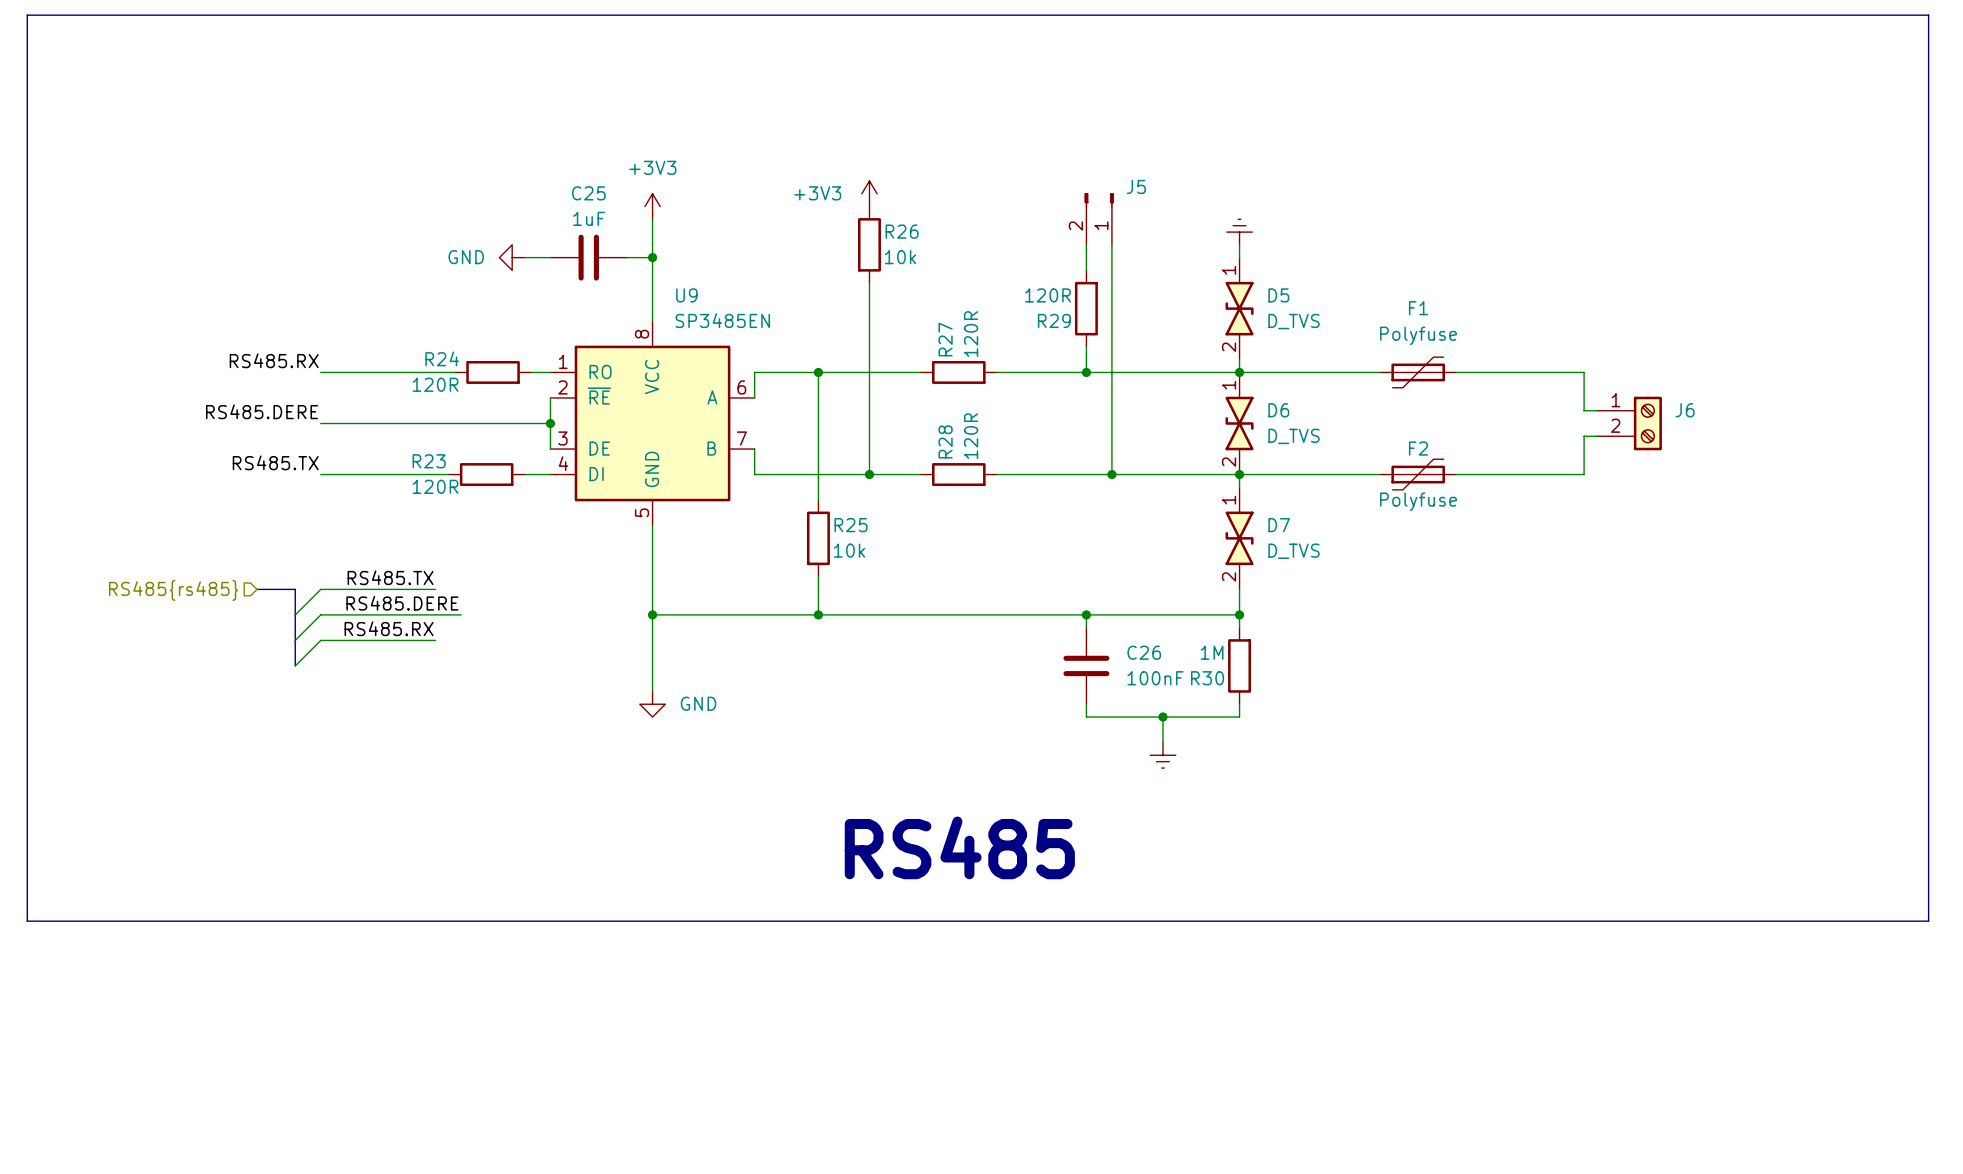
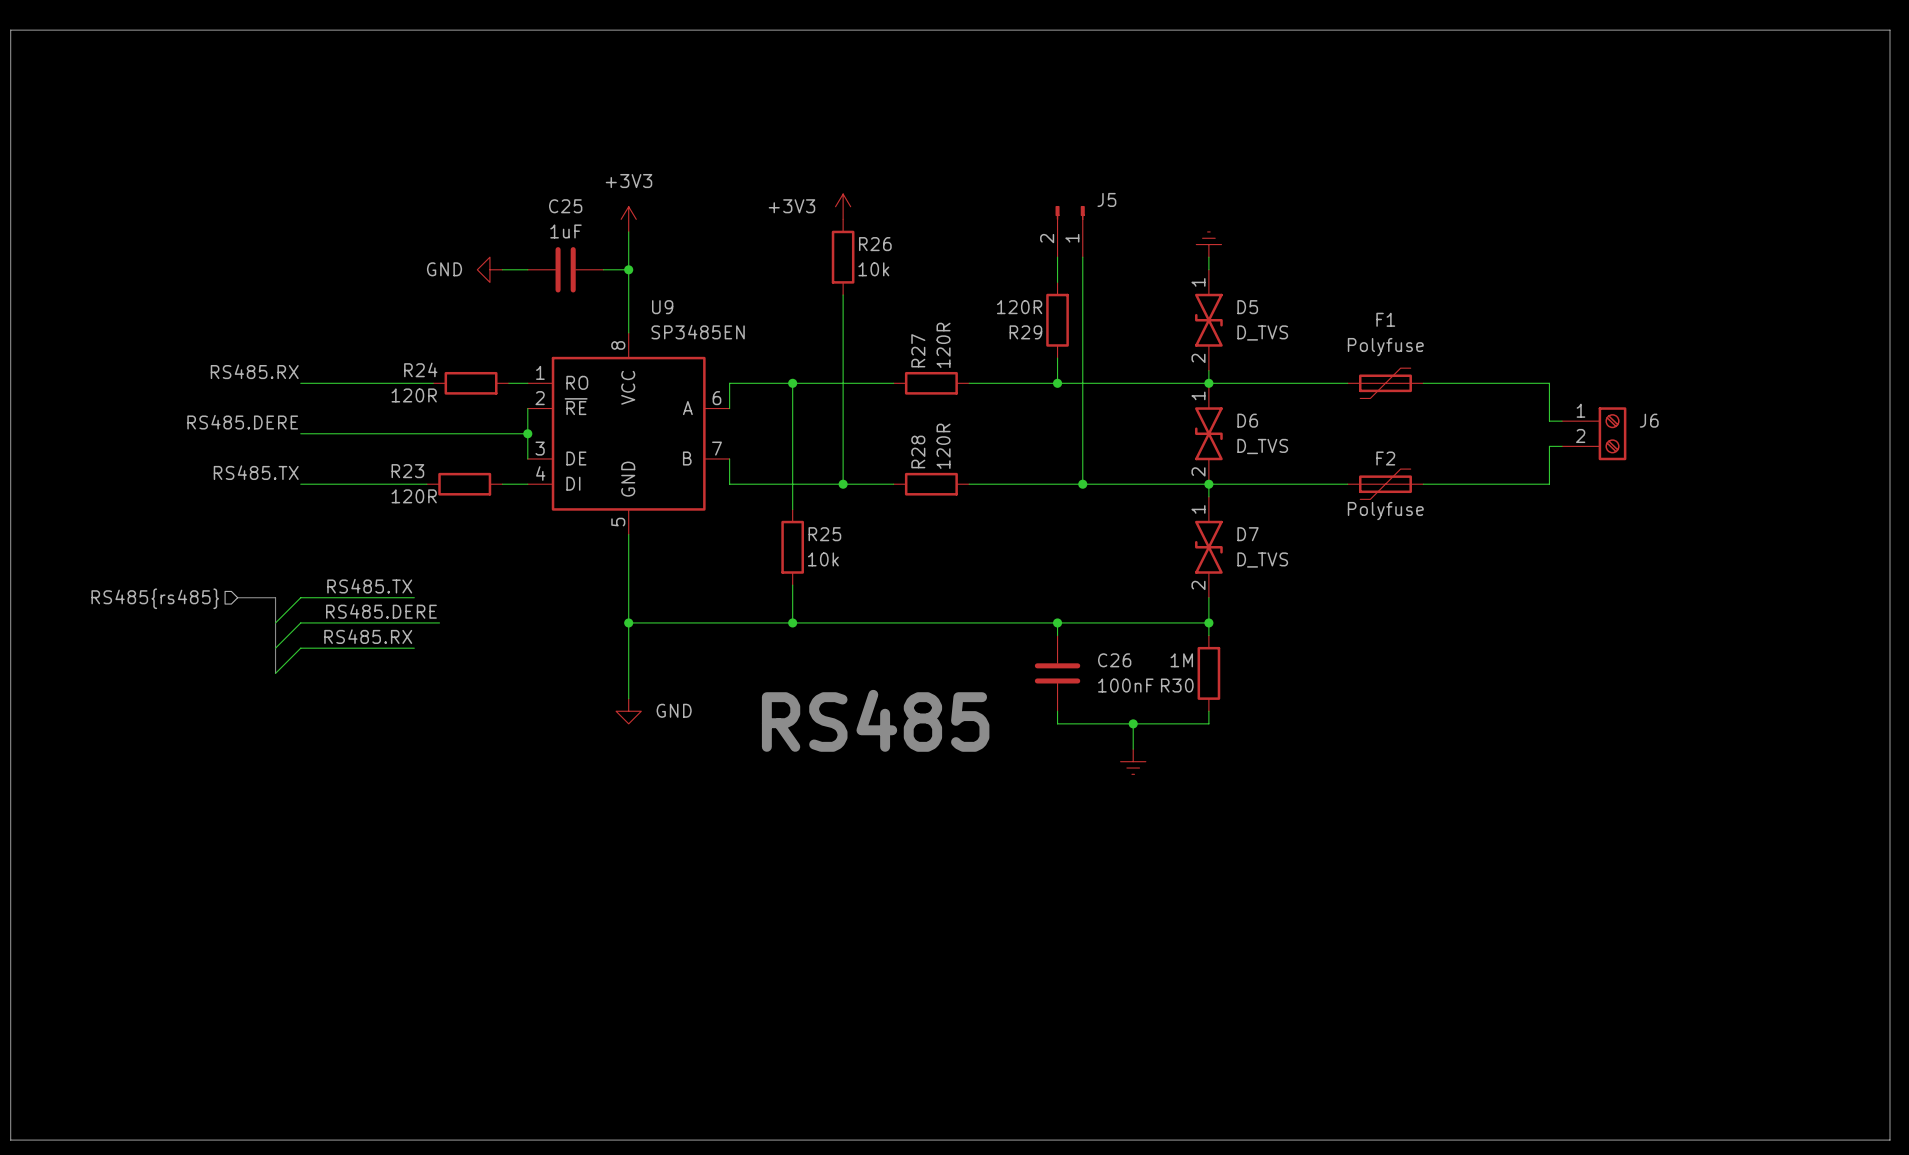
text position: RS485 (959, 847) -> RS485 (875, 720)
line: (27, 921) (1928, 921) -> (10, 925) (10, 1140) (1889, 1140) (1889, 925)

